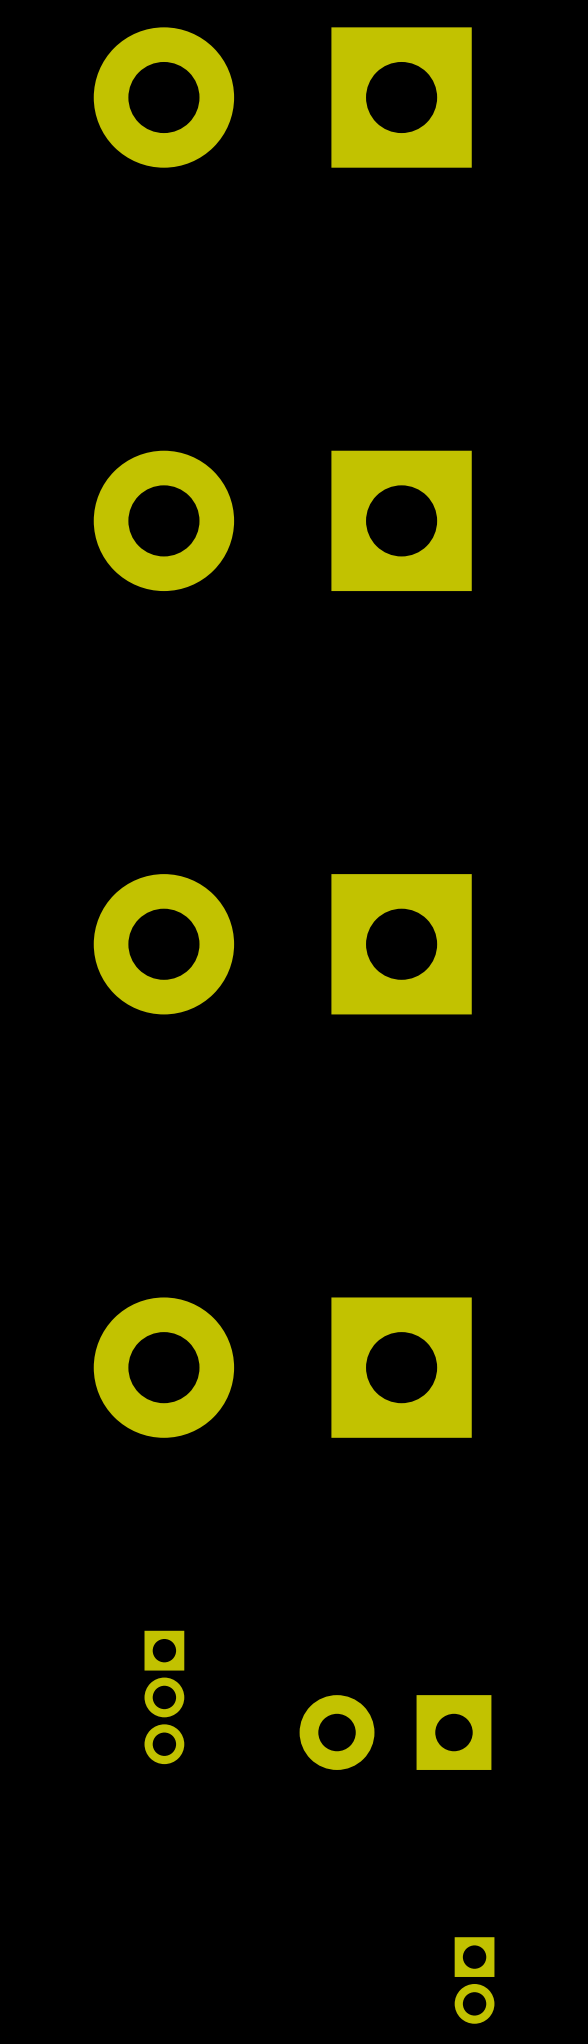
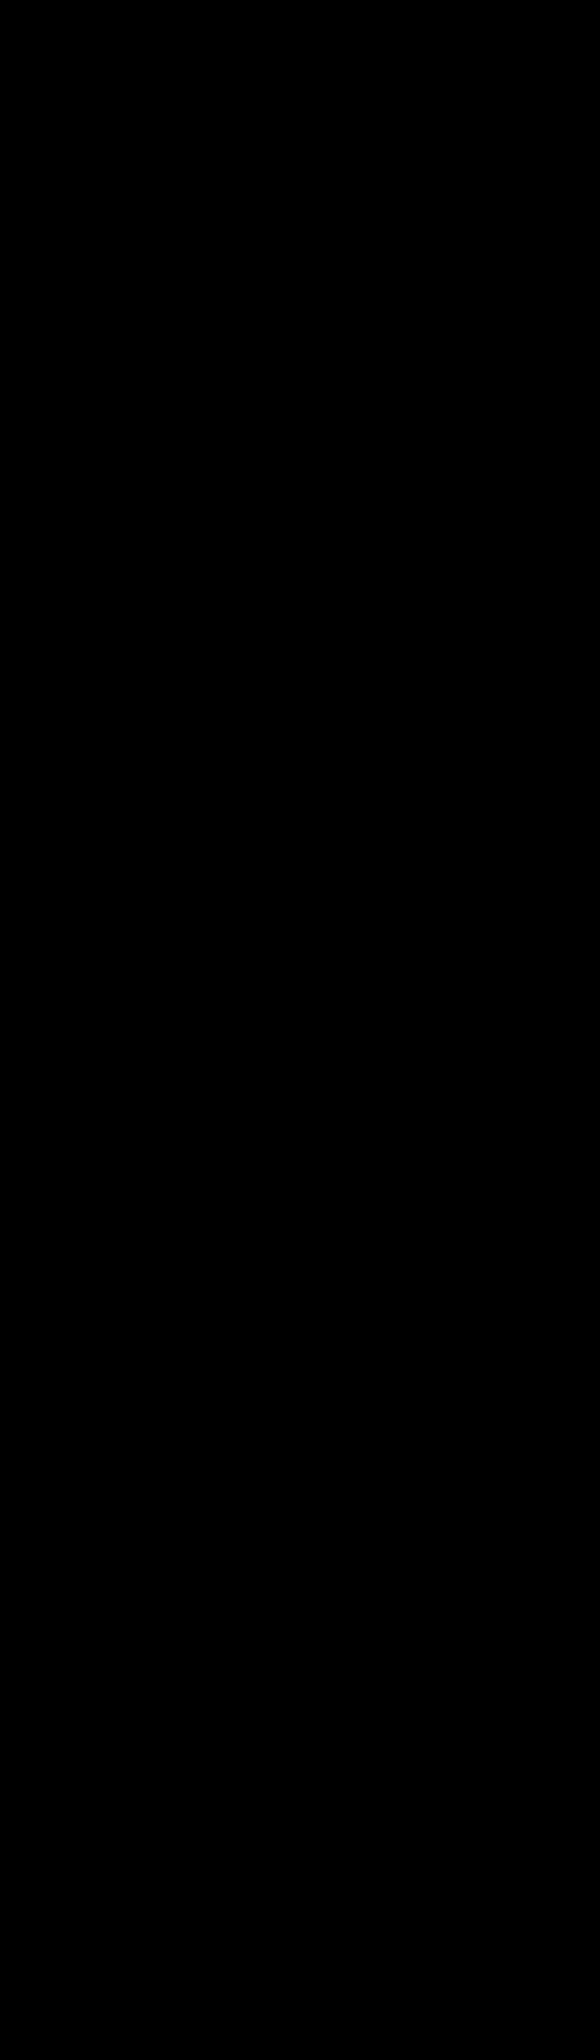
part: (282, 97) -> none
part: (282, 520) -> none
part: (282, 944) -> none
part: (282, 1367) -> none
part: (164, 1697) -> none
part: (395, 1732) -> none
part: (474, 1980) -> none

